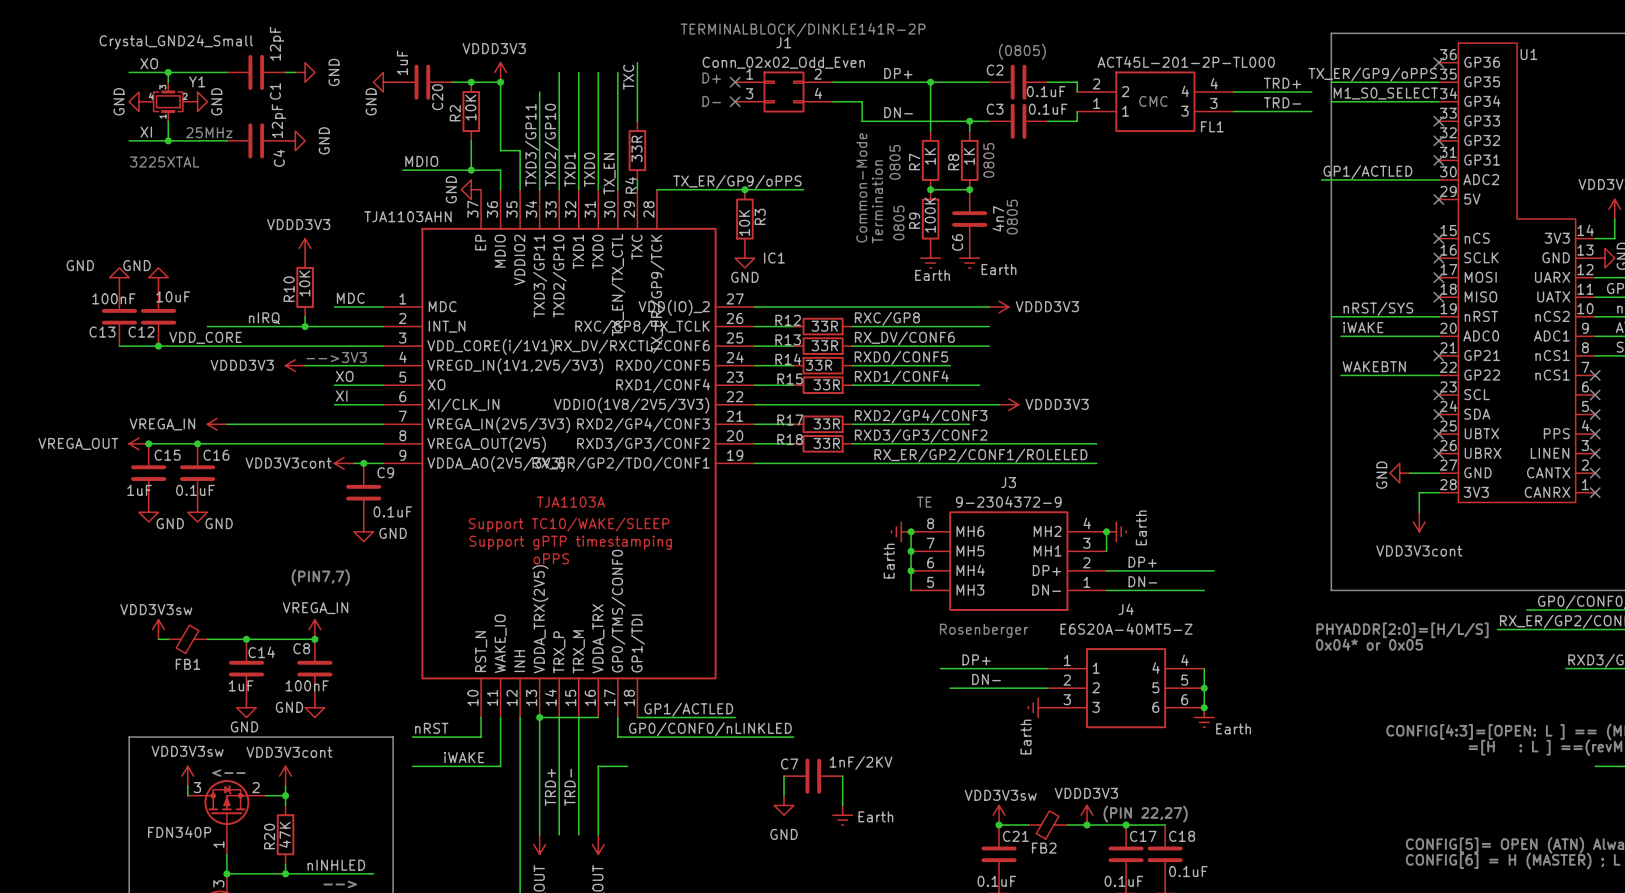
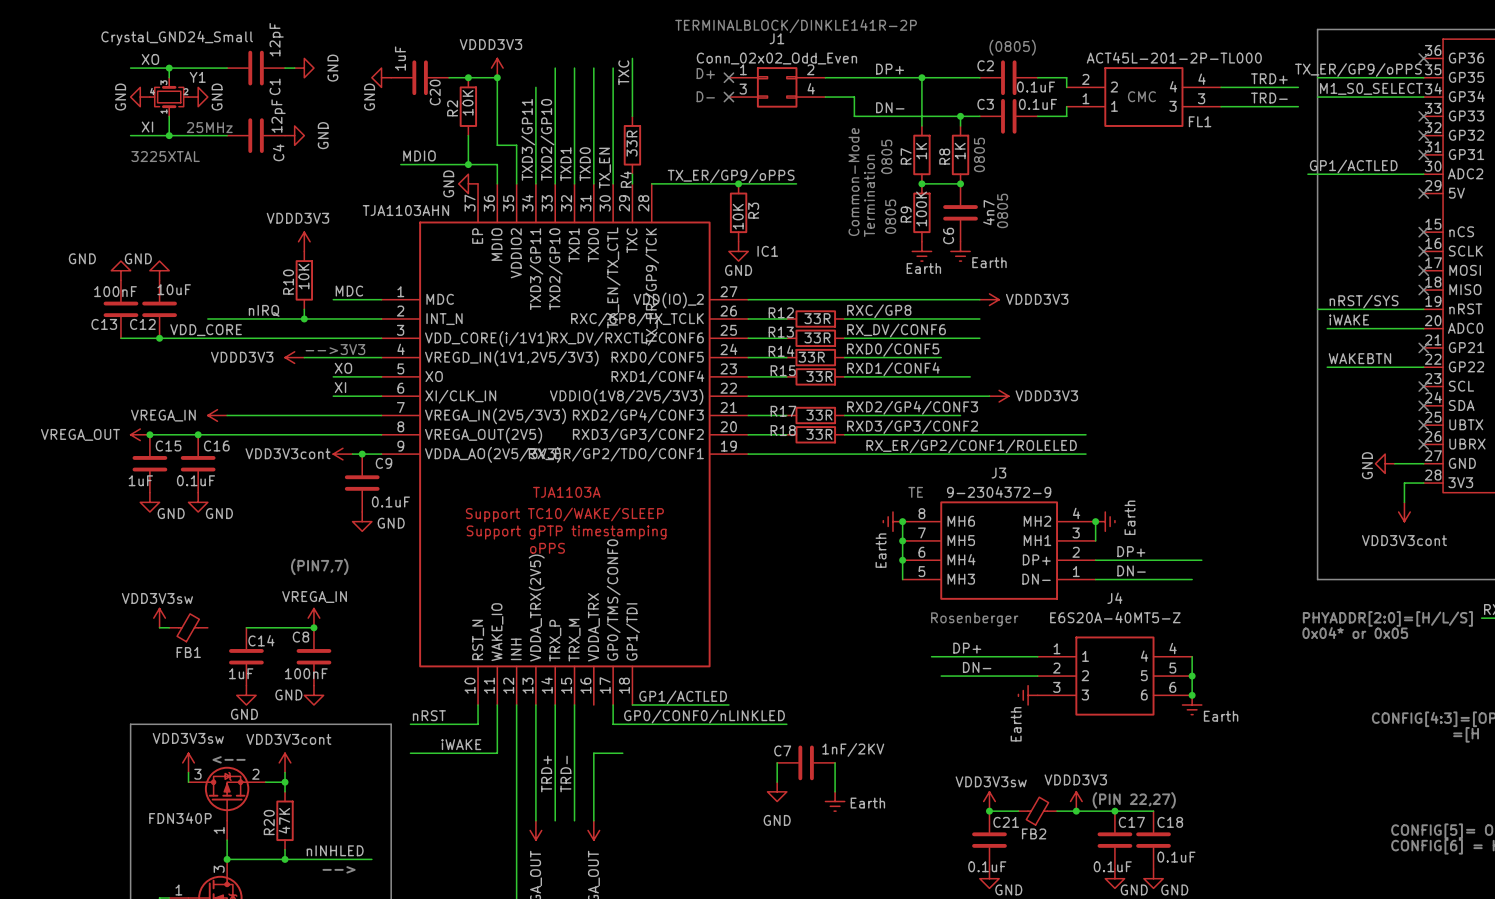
wire: (207, 639) (246, 639) -> none
junction: (246, 639) -> none
wire: (539, 717) (598, 717) -> none
junction: (539, 717) -> none

